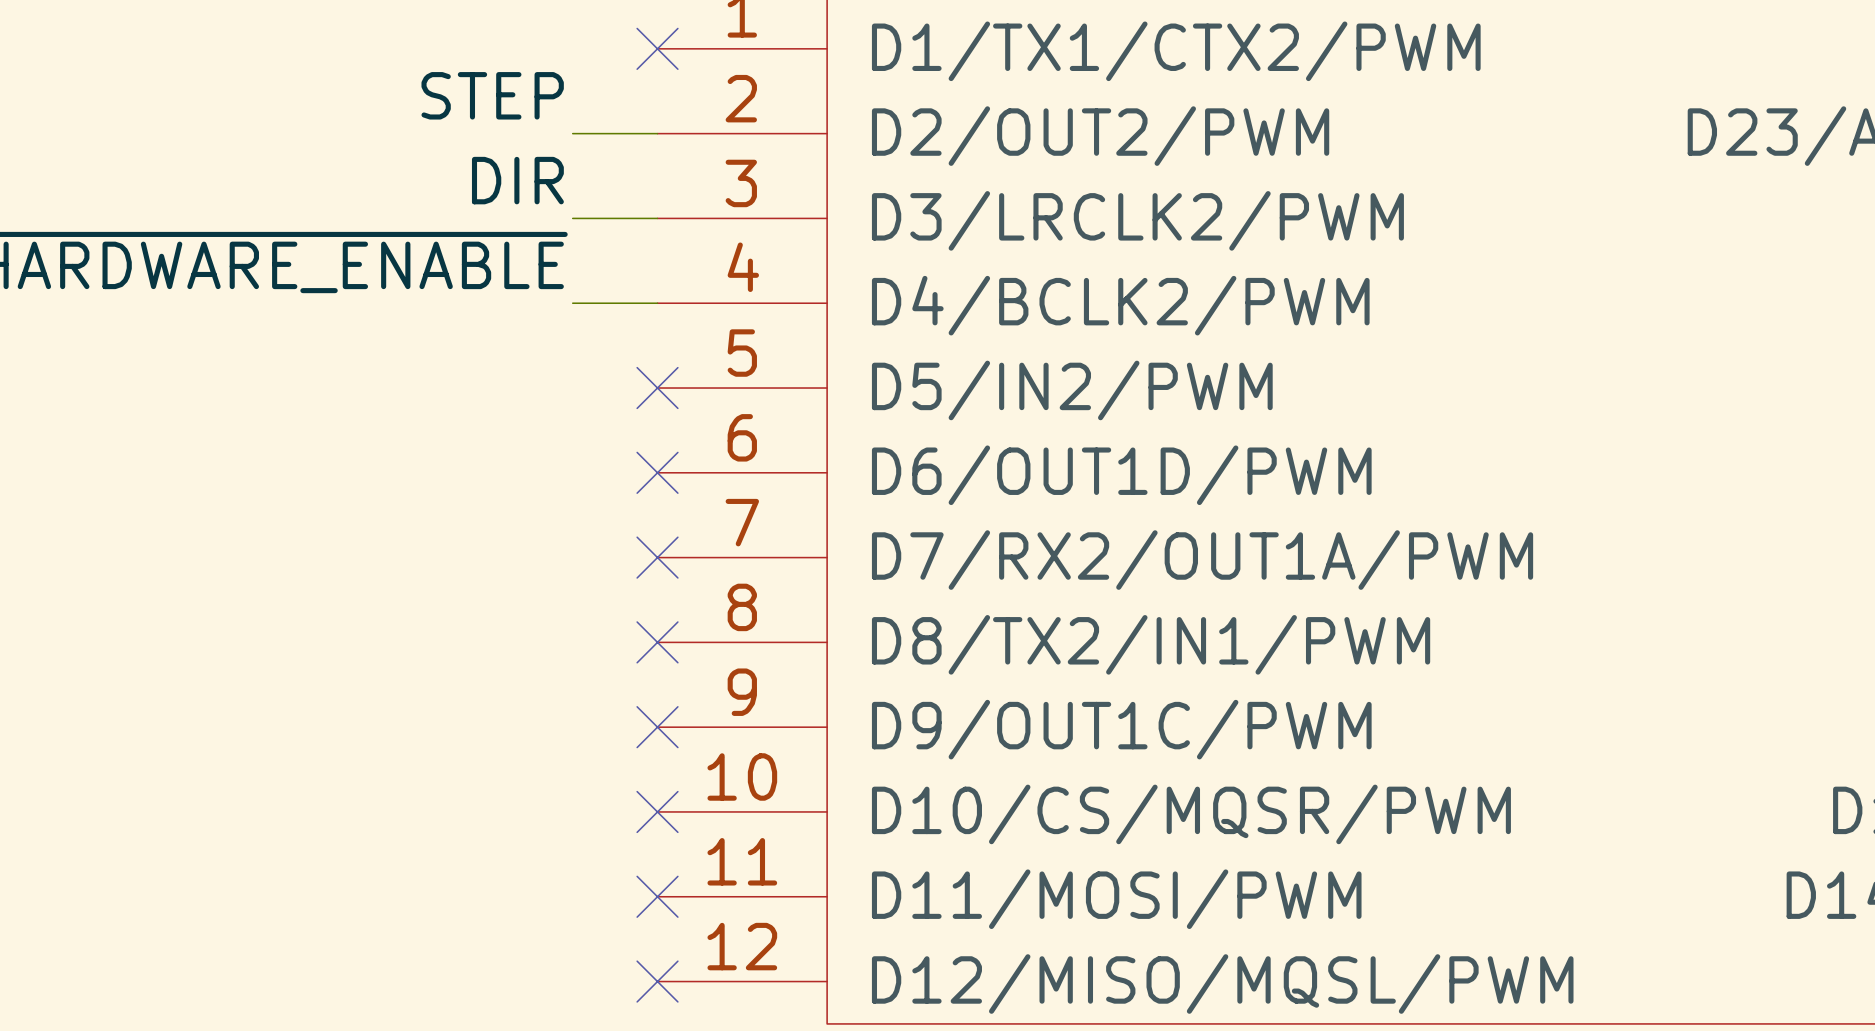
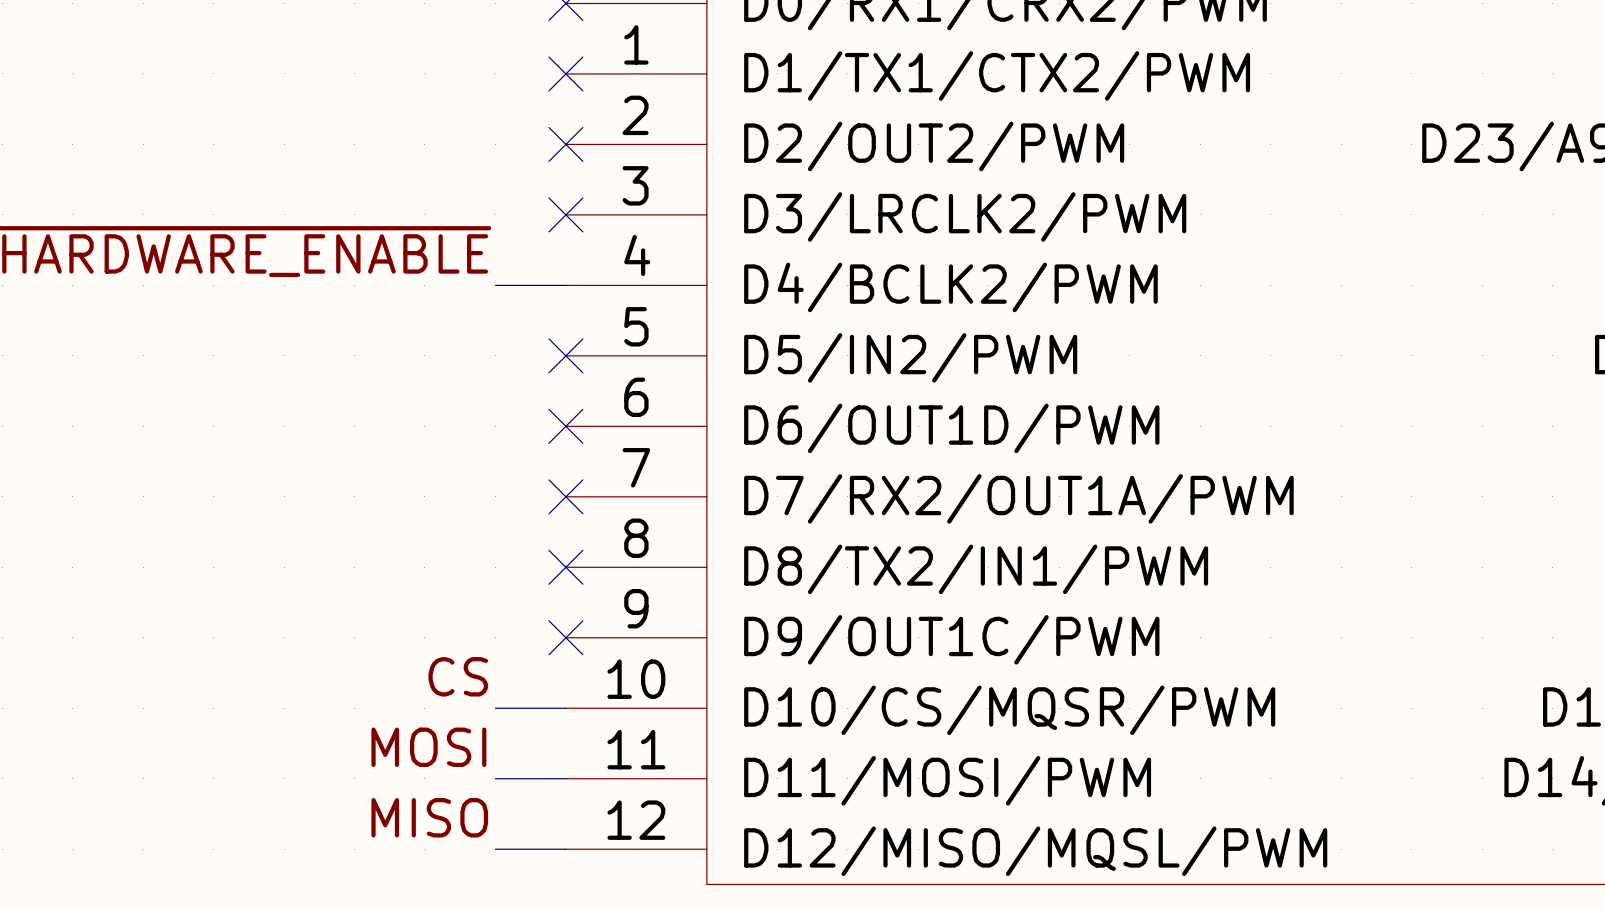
label: STEP (492, 95) -> none
wire: (572, 133) (657, 133) -> (495, 708) (565, 708)
no-connect mark: none -> (565, 144)
label: DIR (517, 180) -> none
wire: (572, 218) (657, 218) -> (495, 778) (565, 778)
no-connect mark: none -> (565, 214)
label: none -> CS (458, 676)
no-connect mark: (657, 811) -> none
label: none -> MOSI (428, 747)
no-connect mark: (657, 896) -> none
label: none -> MISO (429, 817)
wire: none -> (495, 849) (565, 849)
no-connect mark: (657, 981) -> none

